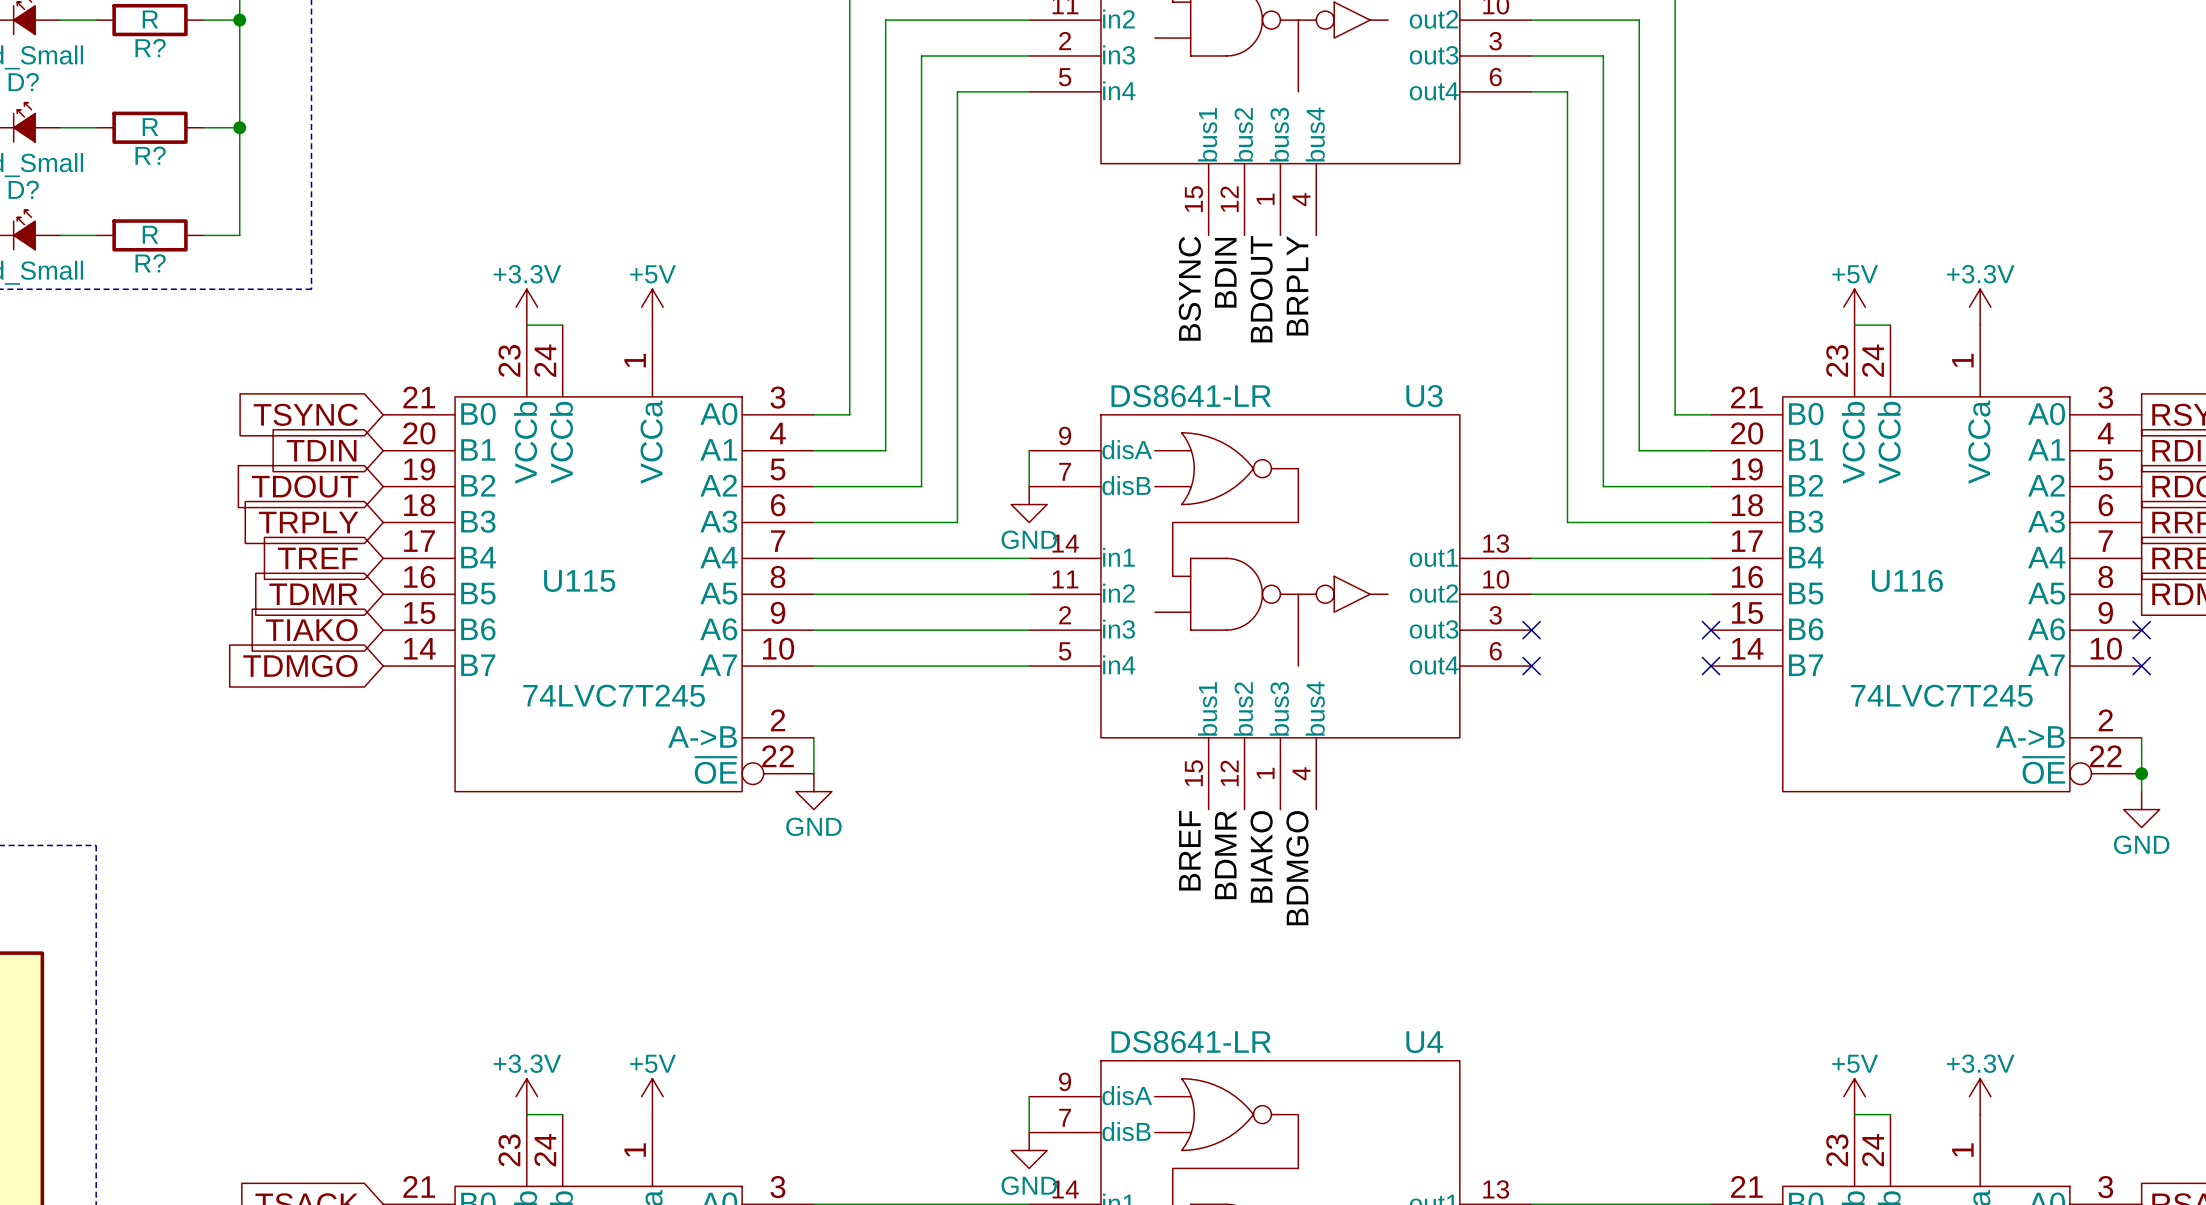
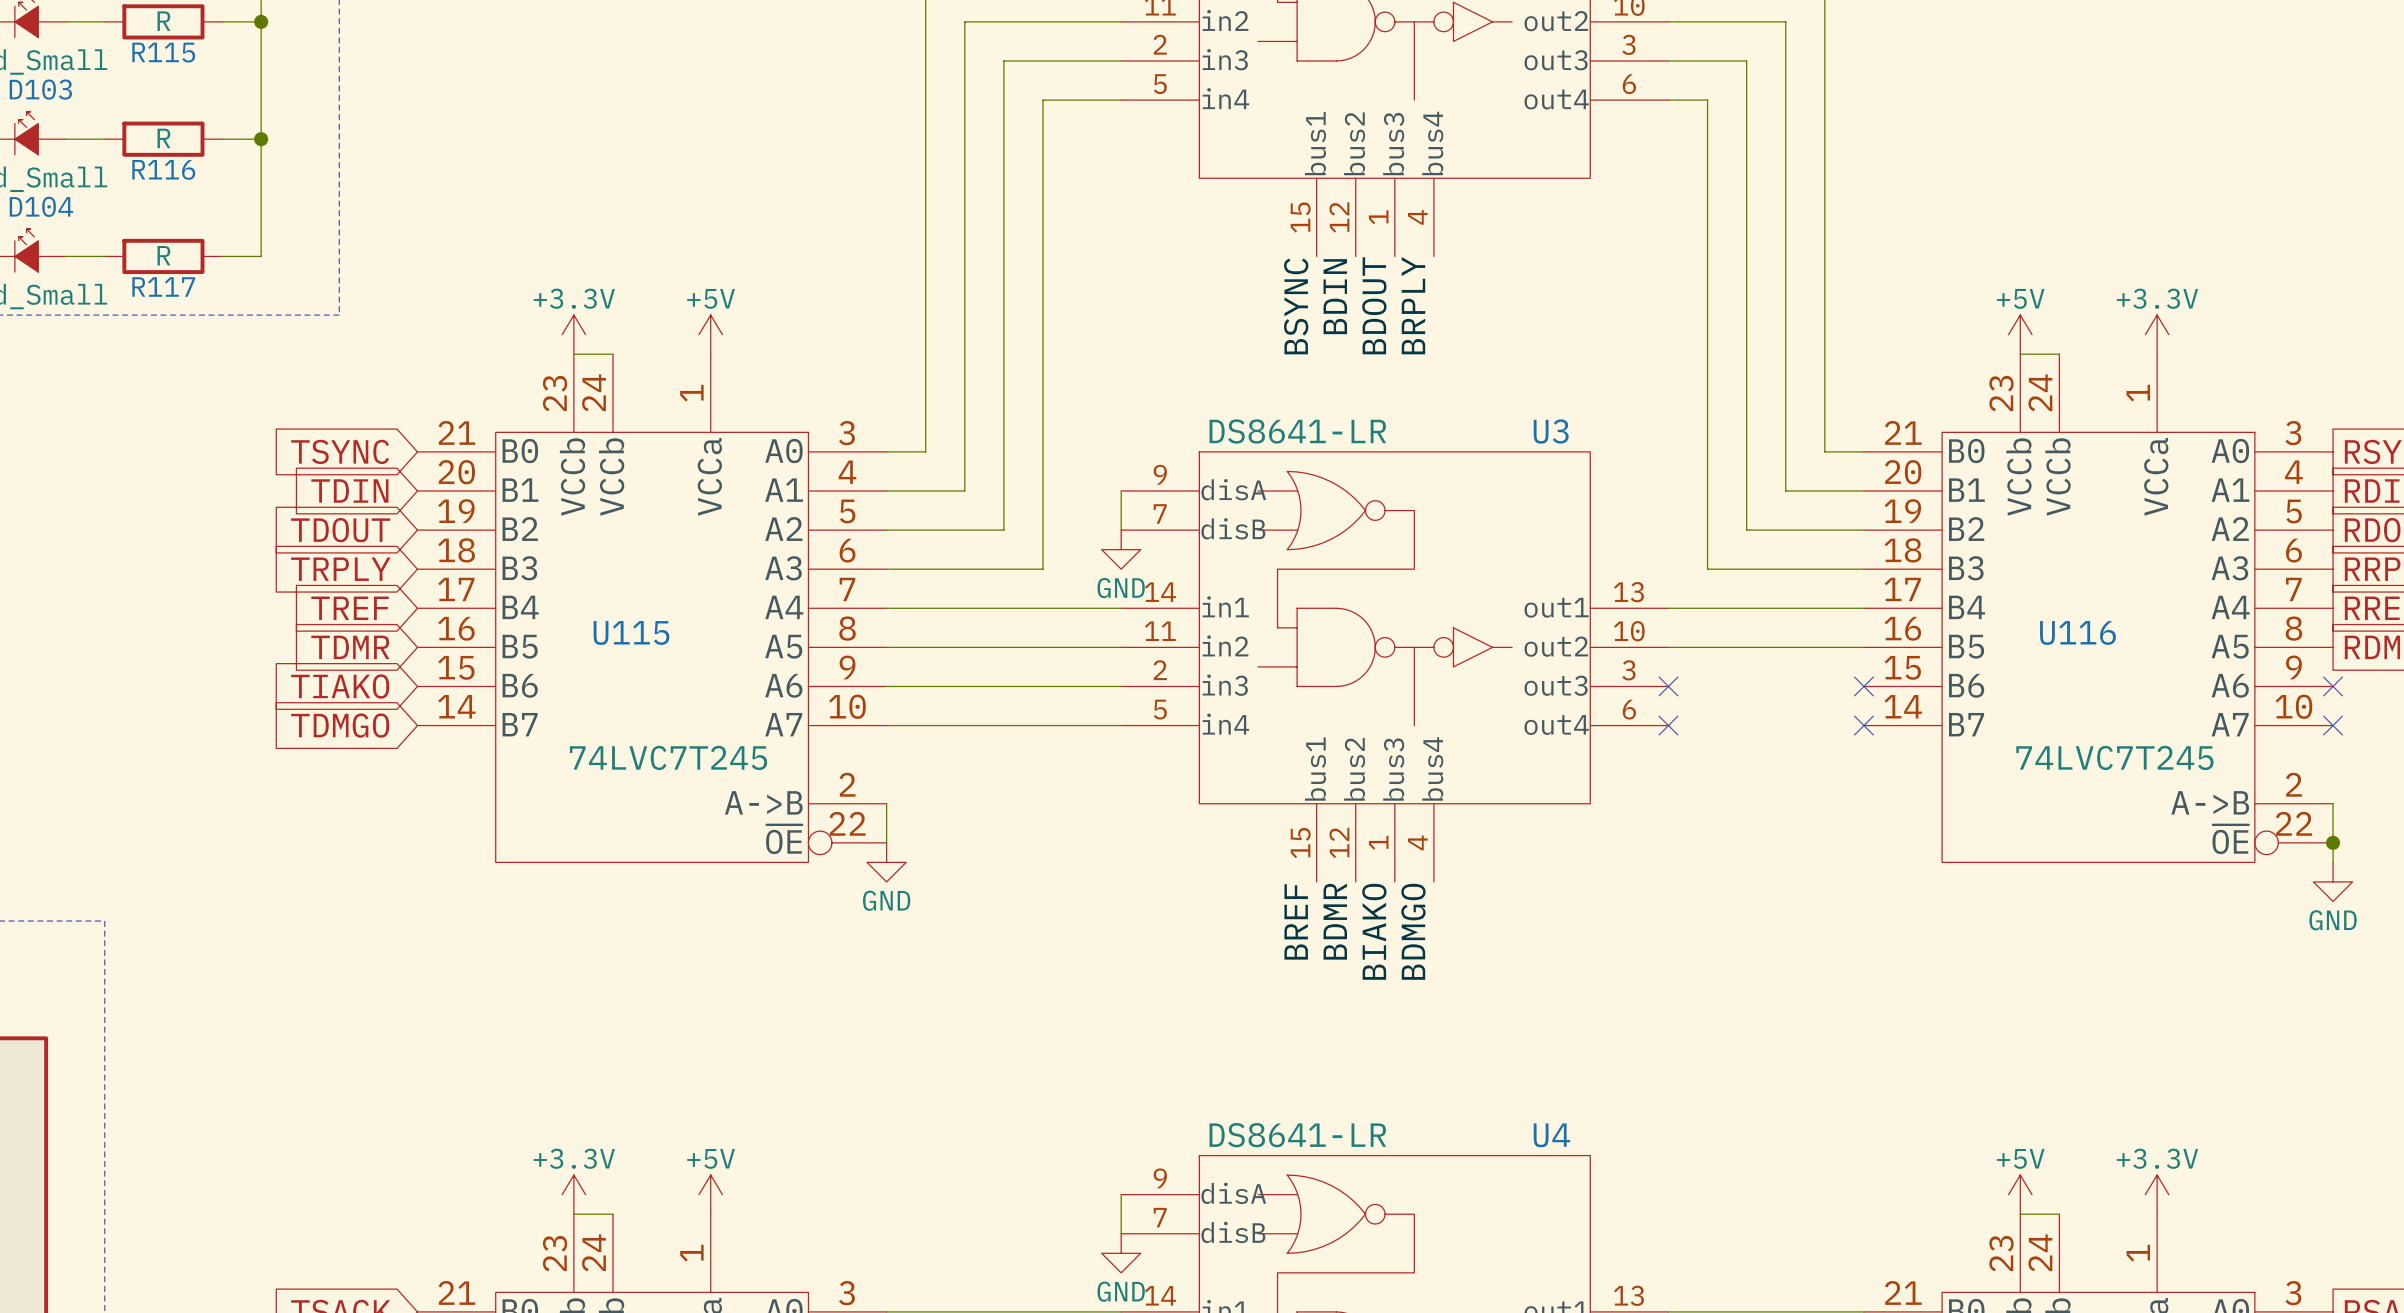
R? name: R? (150, 48) -> R115 (163, 52)
D? name: D? (23, 82) -> D103 (40, 89)
R? name: R? (150, 155) -> R116 (163, 169)
D? name: D? (23, 189) -> D104 (41, 206)
R? name: R? (150, 263) -> R117 (163, 286)

